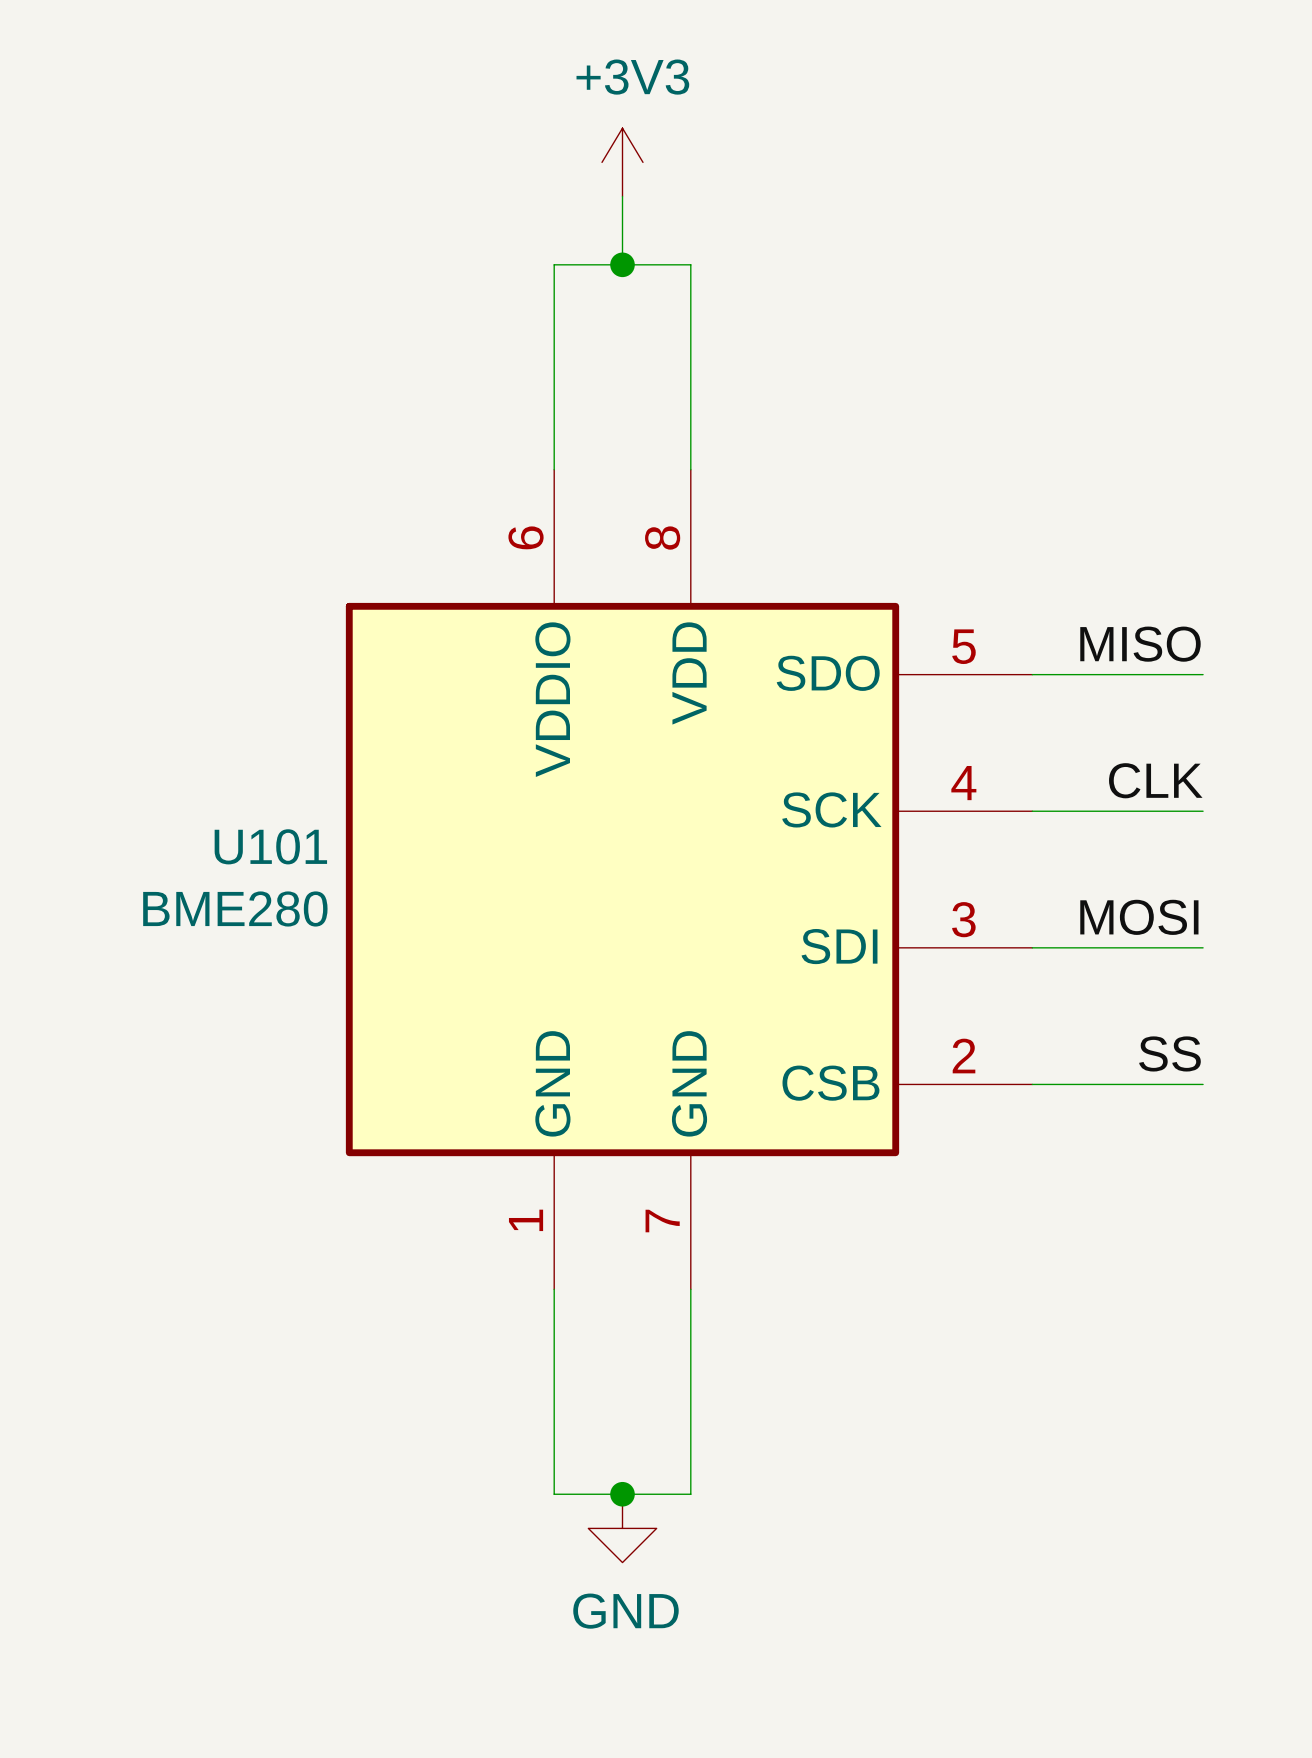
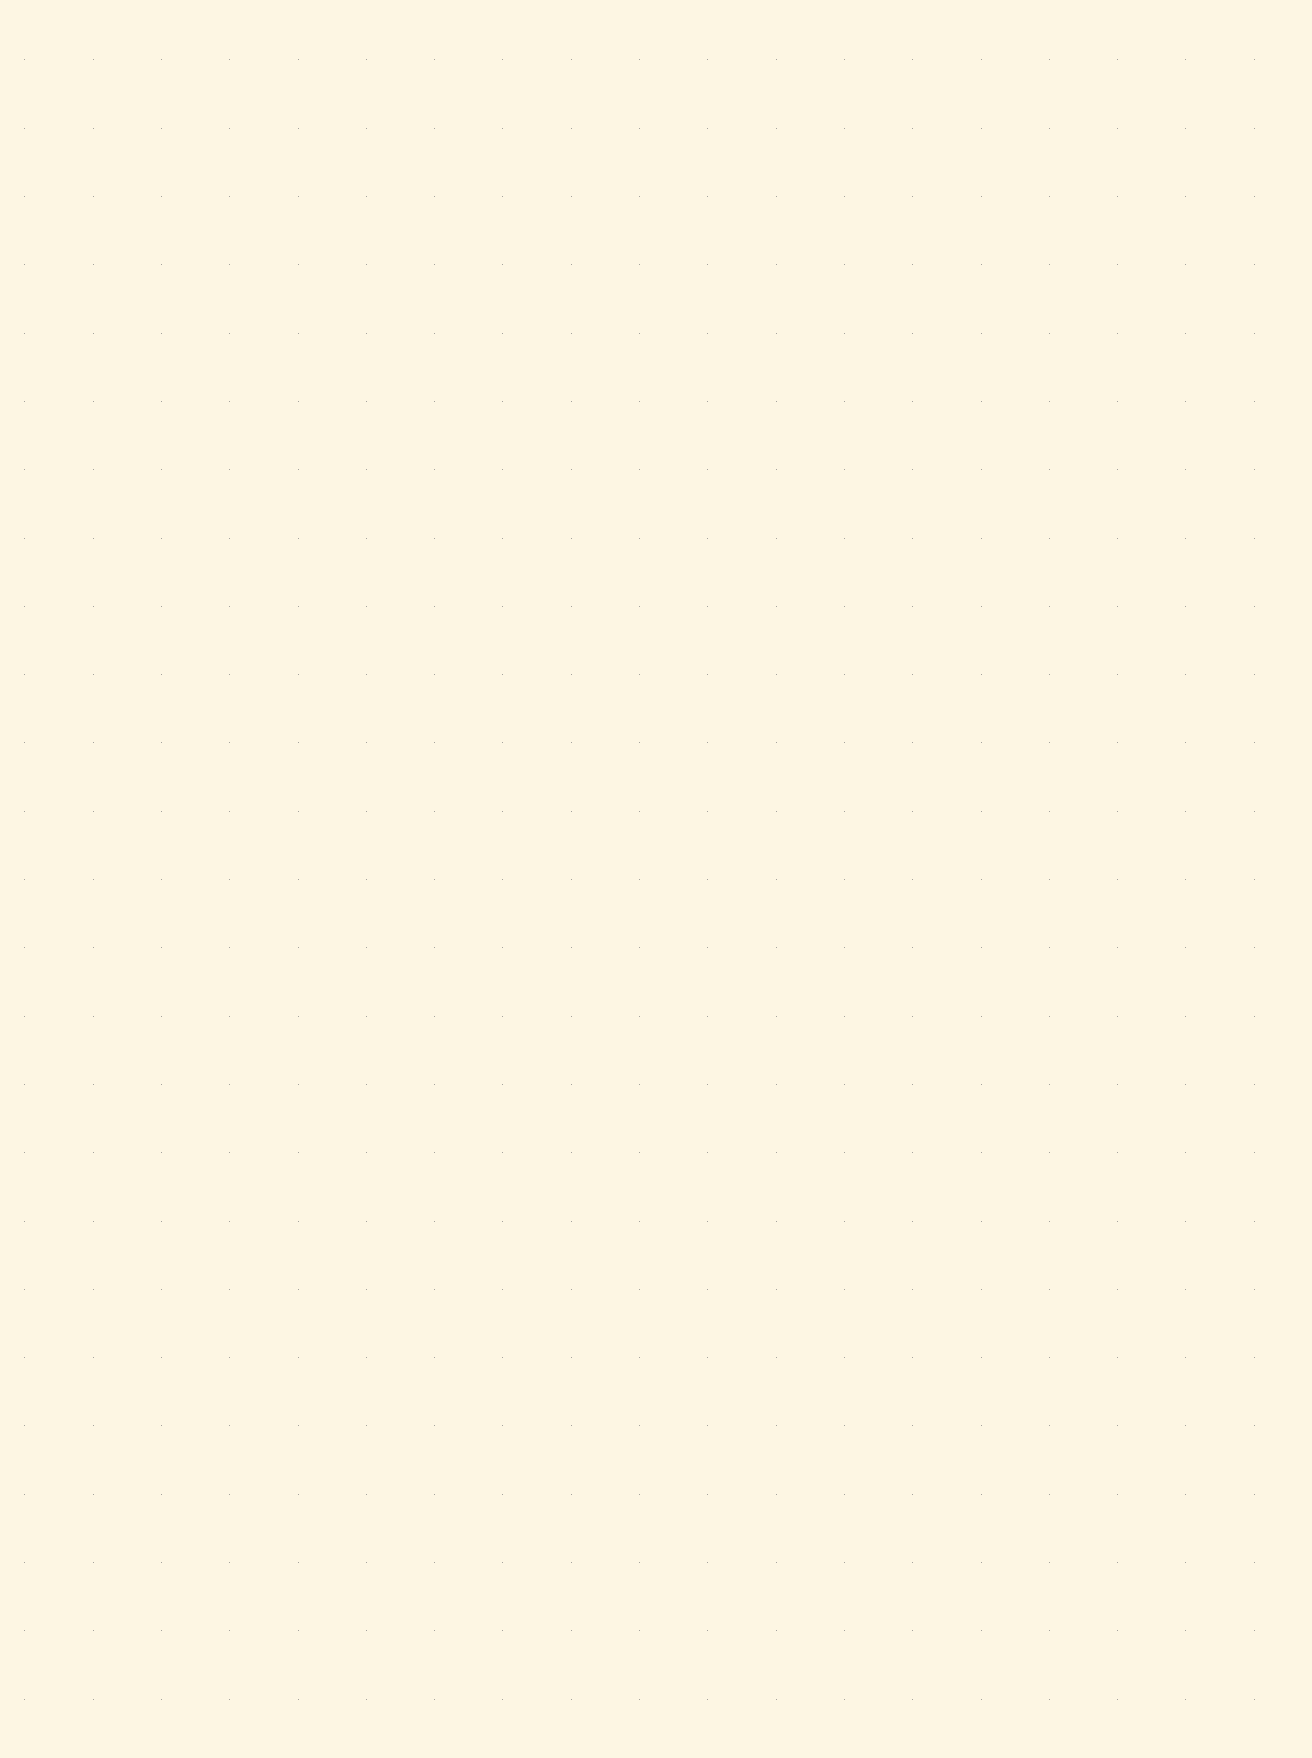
power symbol: +3V3 (622, 162) -> none
wire: (622, 196) (622, 264) -> none
junction: (622, 264) -> none
wire: (554, 469) (554, 264) (690, 264) (690, 469) -> none
label: MISO (1140, 644) -> none
wire: (1032, 674) (1203, 674) -> none
label: CLK (1155, 780) -> none
wire: (1032, 811) (1203, 811) -> none
U101: BME280 (689, 879) -> none
label: MOSI (1139, 917) -> none
wire: (1032, 947) (1203, 947) -> none
label: SS (1169, 1053) -> none
wire: (1032, 1084) (1203, 1084) -> none
wire: (554, 1289) (554, 1494) (690, 1494) (690, 1289) -> none
junction: (622, 1494) -> none
power symbol: GND (622, 1528) -> none

